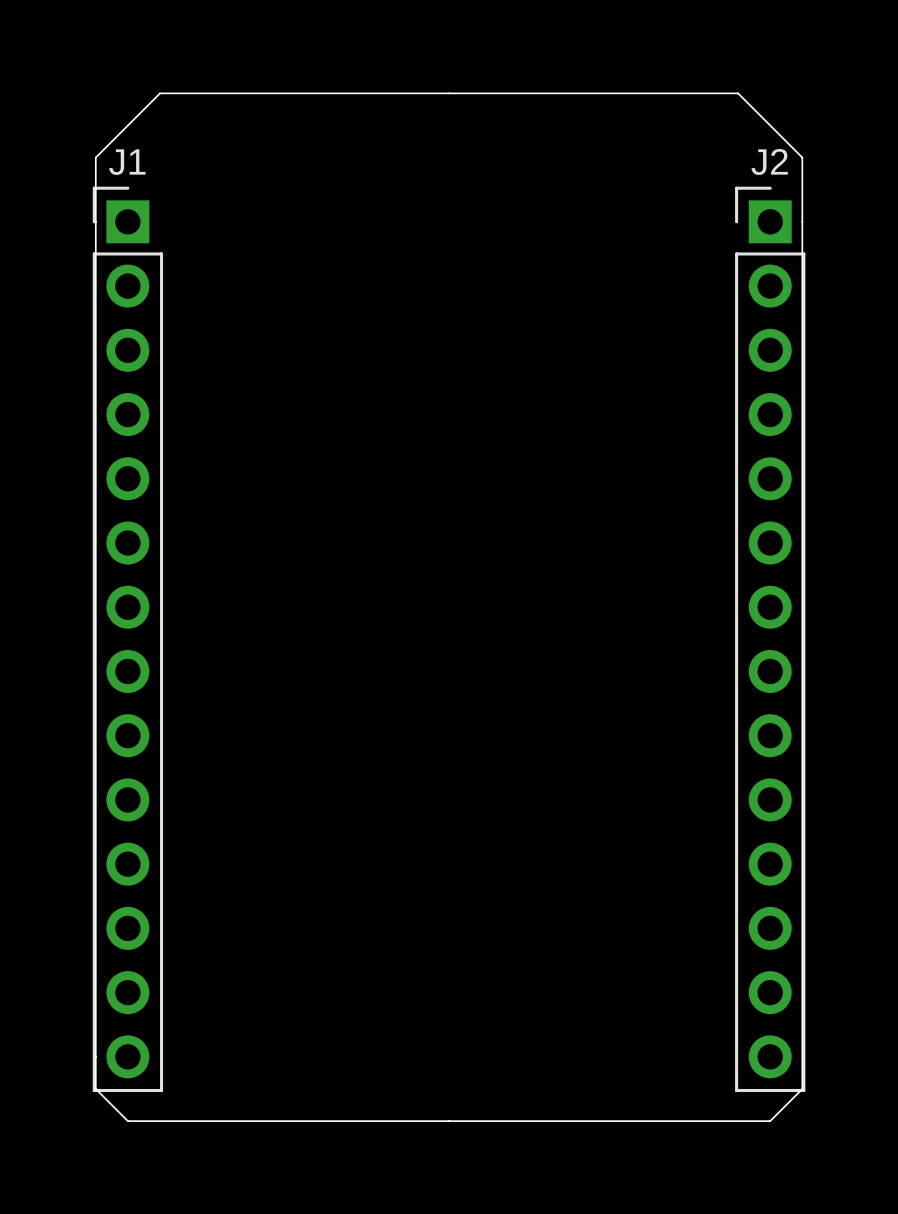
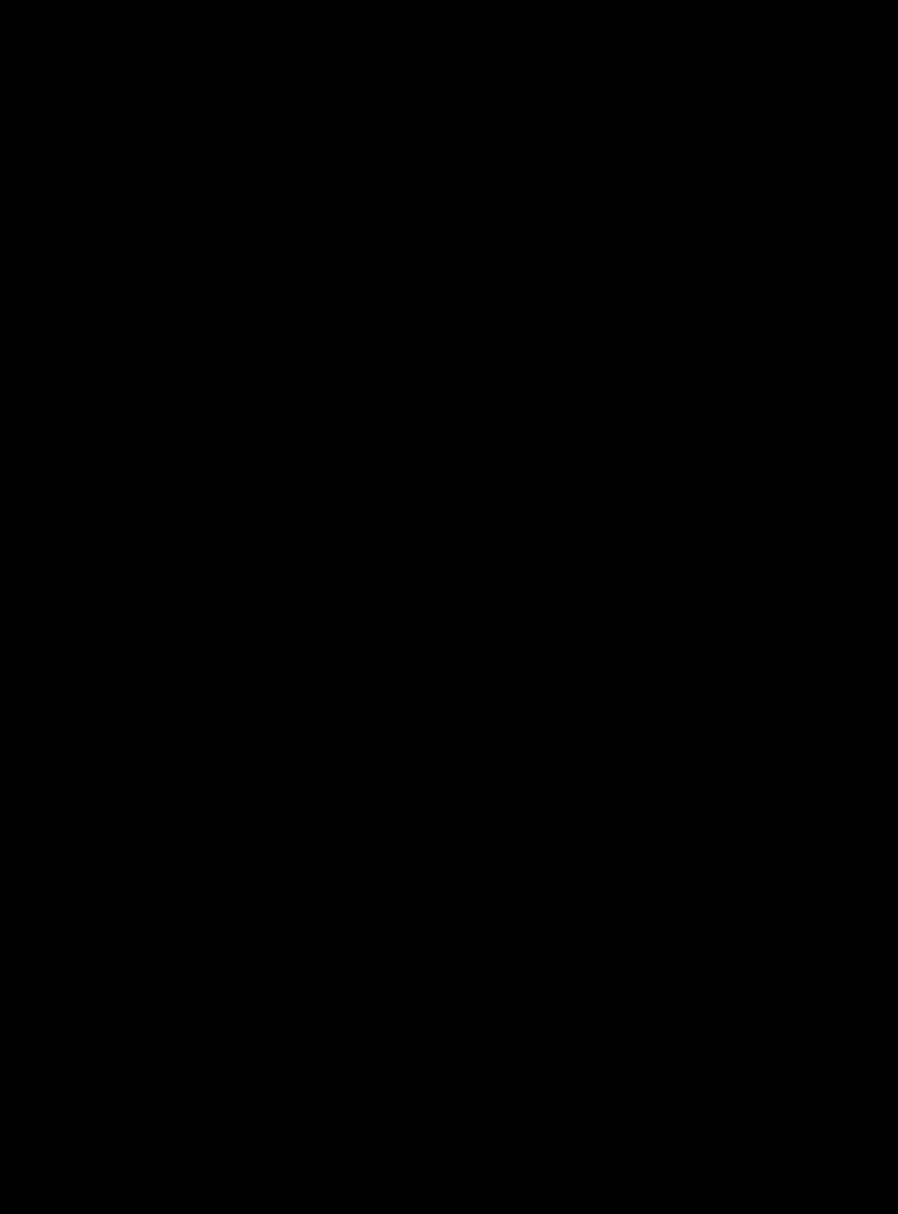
board edge: (738, 93) (160, 93) (95, 157) (95, 1088) (127, 1121) (770, 1121) (802, 1088) (802, 157) (738, 93) -> none
J1: (127, 639) -> none
J2: (770, 639) -> none

